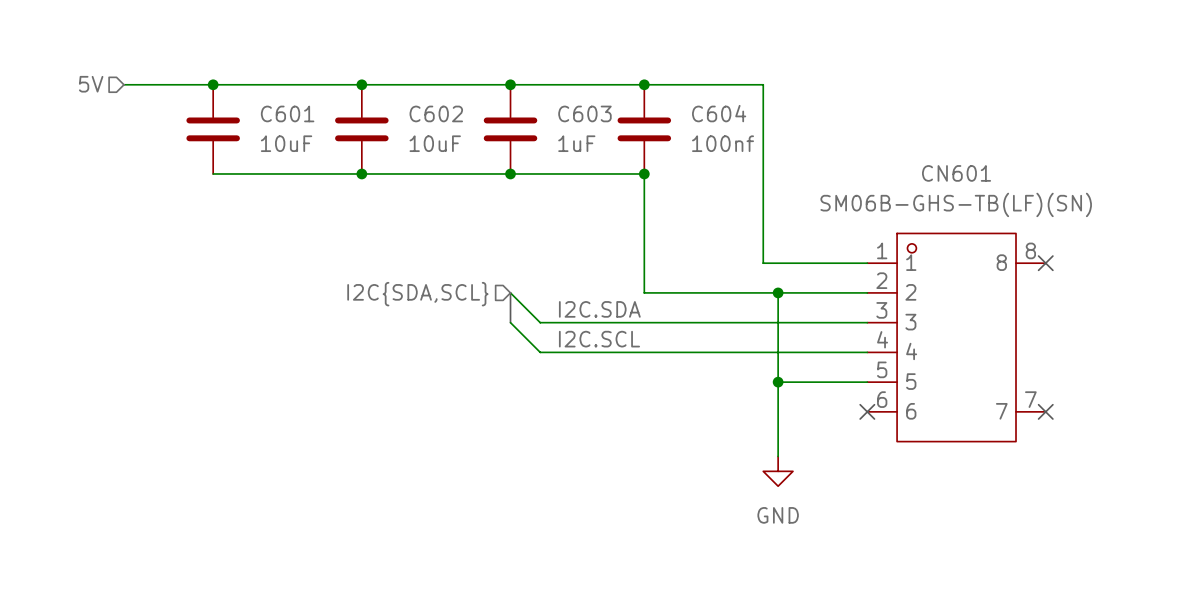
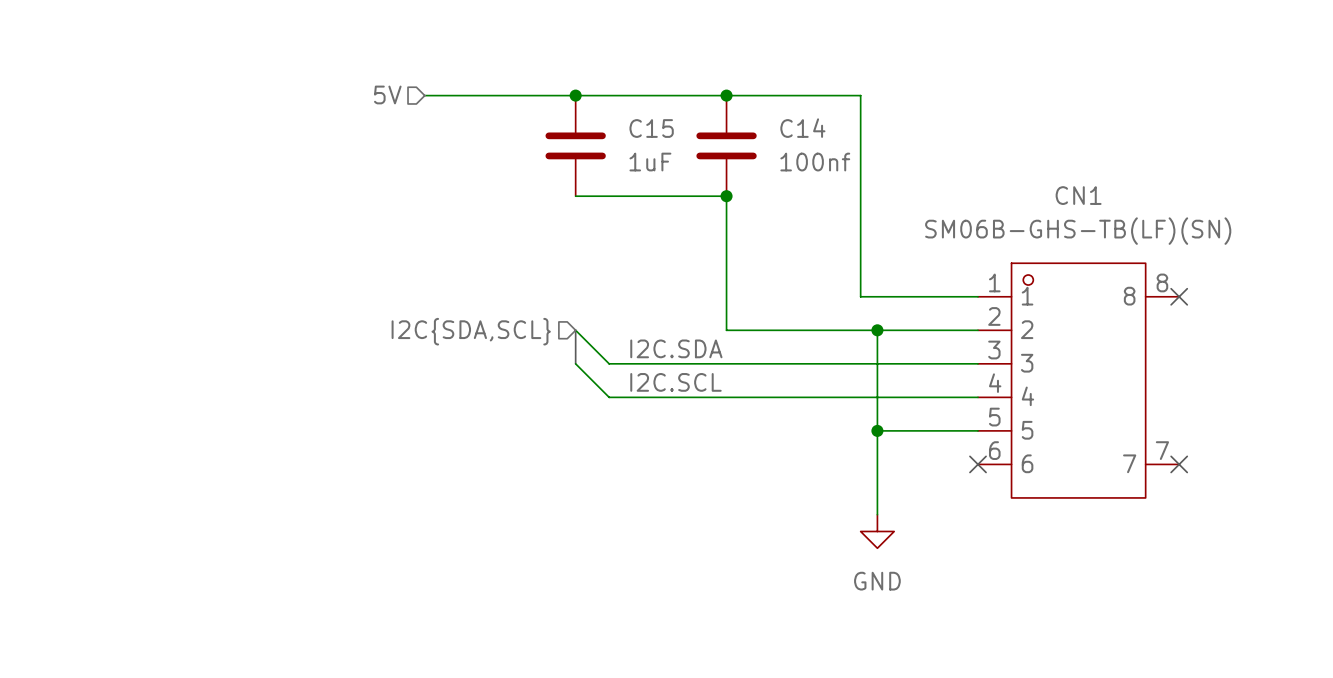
hierarchical label position: 5V (91, 84) -> 5V (387, 94)
wire: (123, 84) (376, 84) -> none
junction: (213, 84) -> none
junction: (361, 84) -> none
C603 name: C603 (584, 113) -> C15 (651, 128)
C604 name: C604 (719, 113) -> C14 (802, 128)
C601: 10uF (213, 129) -> none
C602: 10uF (361, 129) -> none
wire: (213, 173) (510, 173) -> none
junction: (361, 173) -> none
junction: (510, 173) -> none
CN601 name: CN601 (956, 173) -> CN1 (1078, 195)

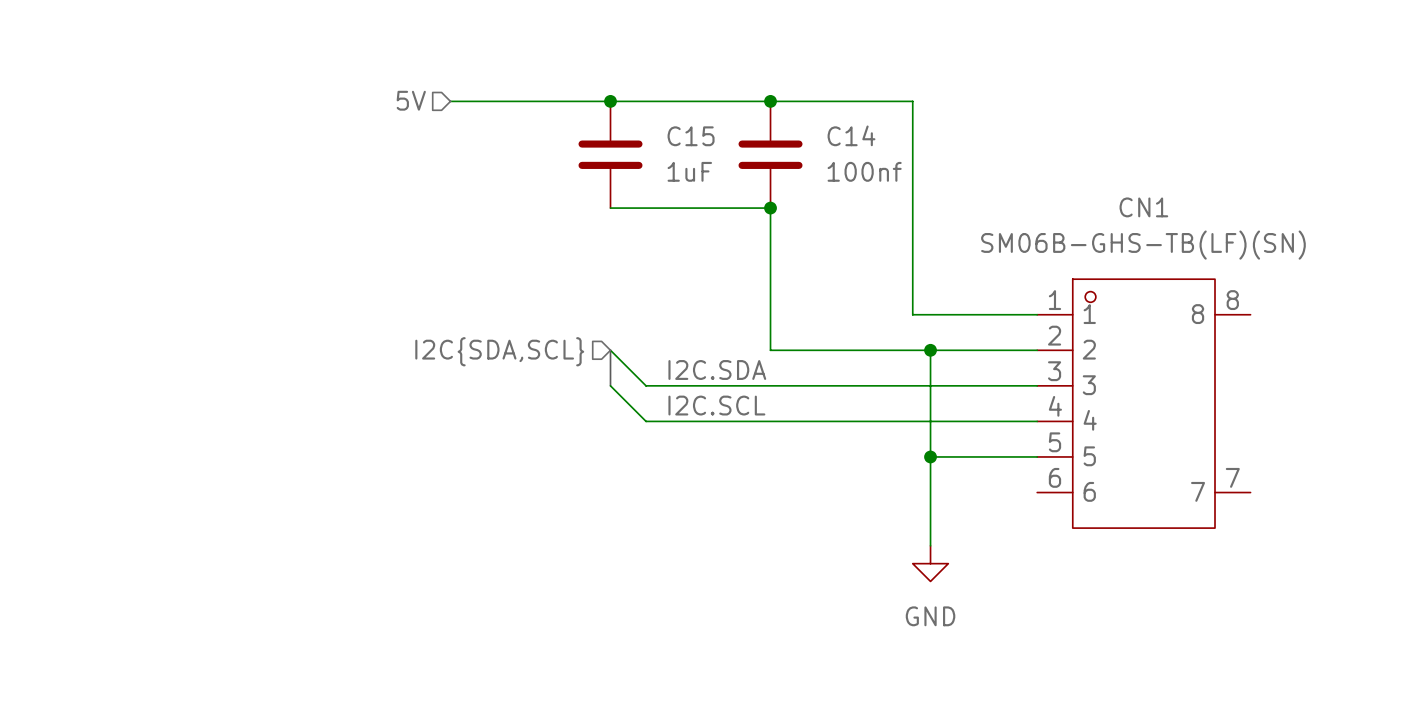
no-connect mark: (1179, 296) -> none
no-connect mark: (978, 464) -> none
no-connect mark: (1179, 464) -> none

